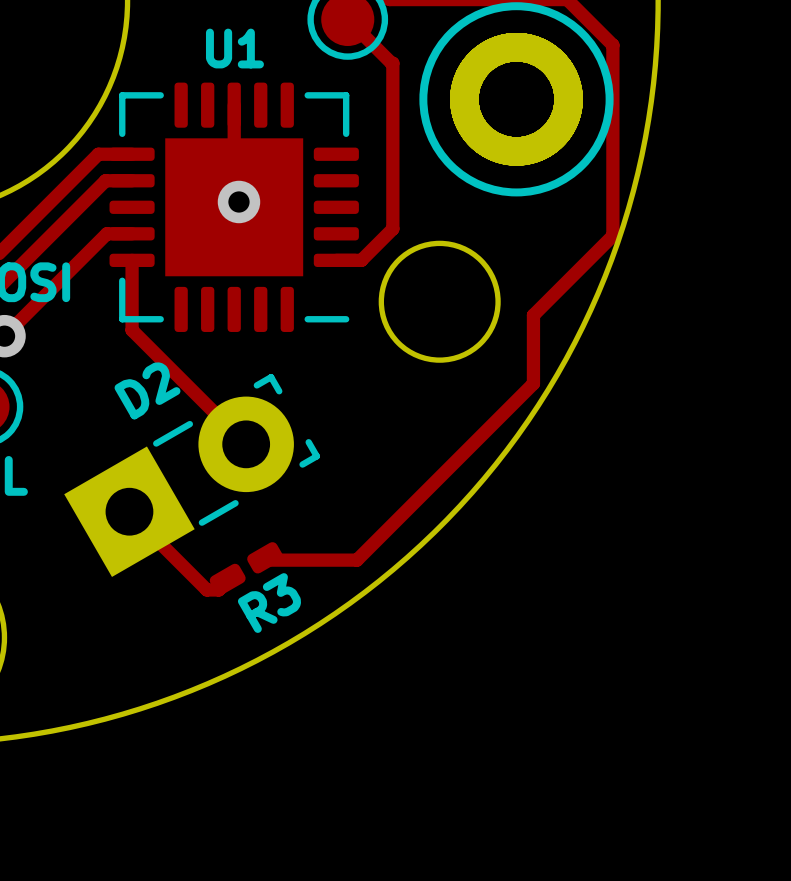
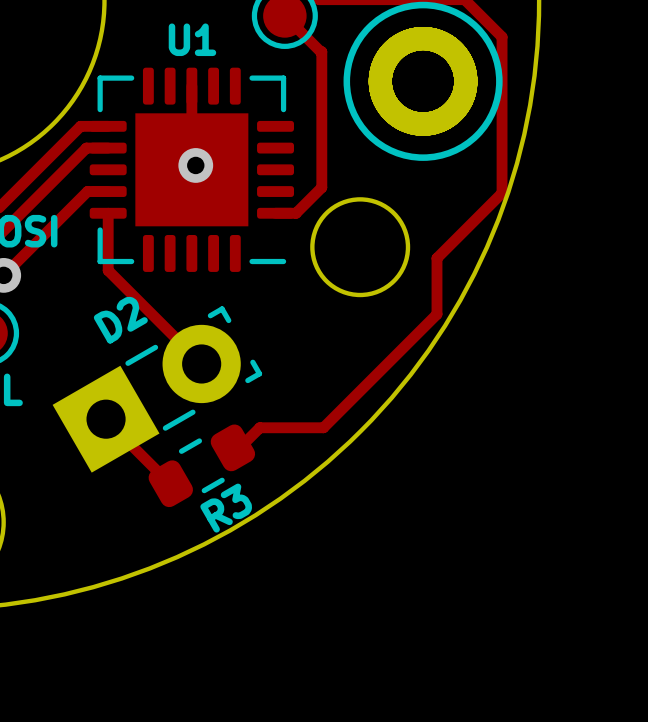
track: (394, 522) (356, 560) (261, 560) -> (323, 427) (259, 427) (239, 447) (232, 447)
R3 footprint: [209, 542, 284, 596] -> [148, 424, 256, 508]

